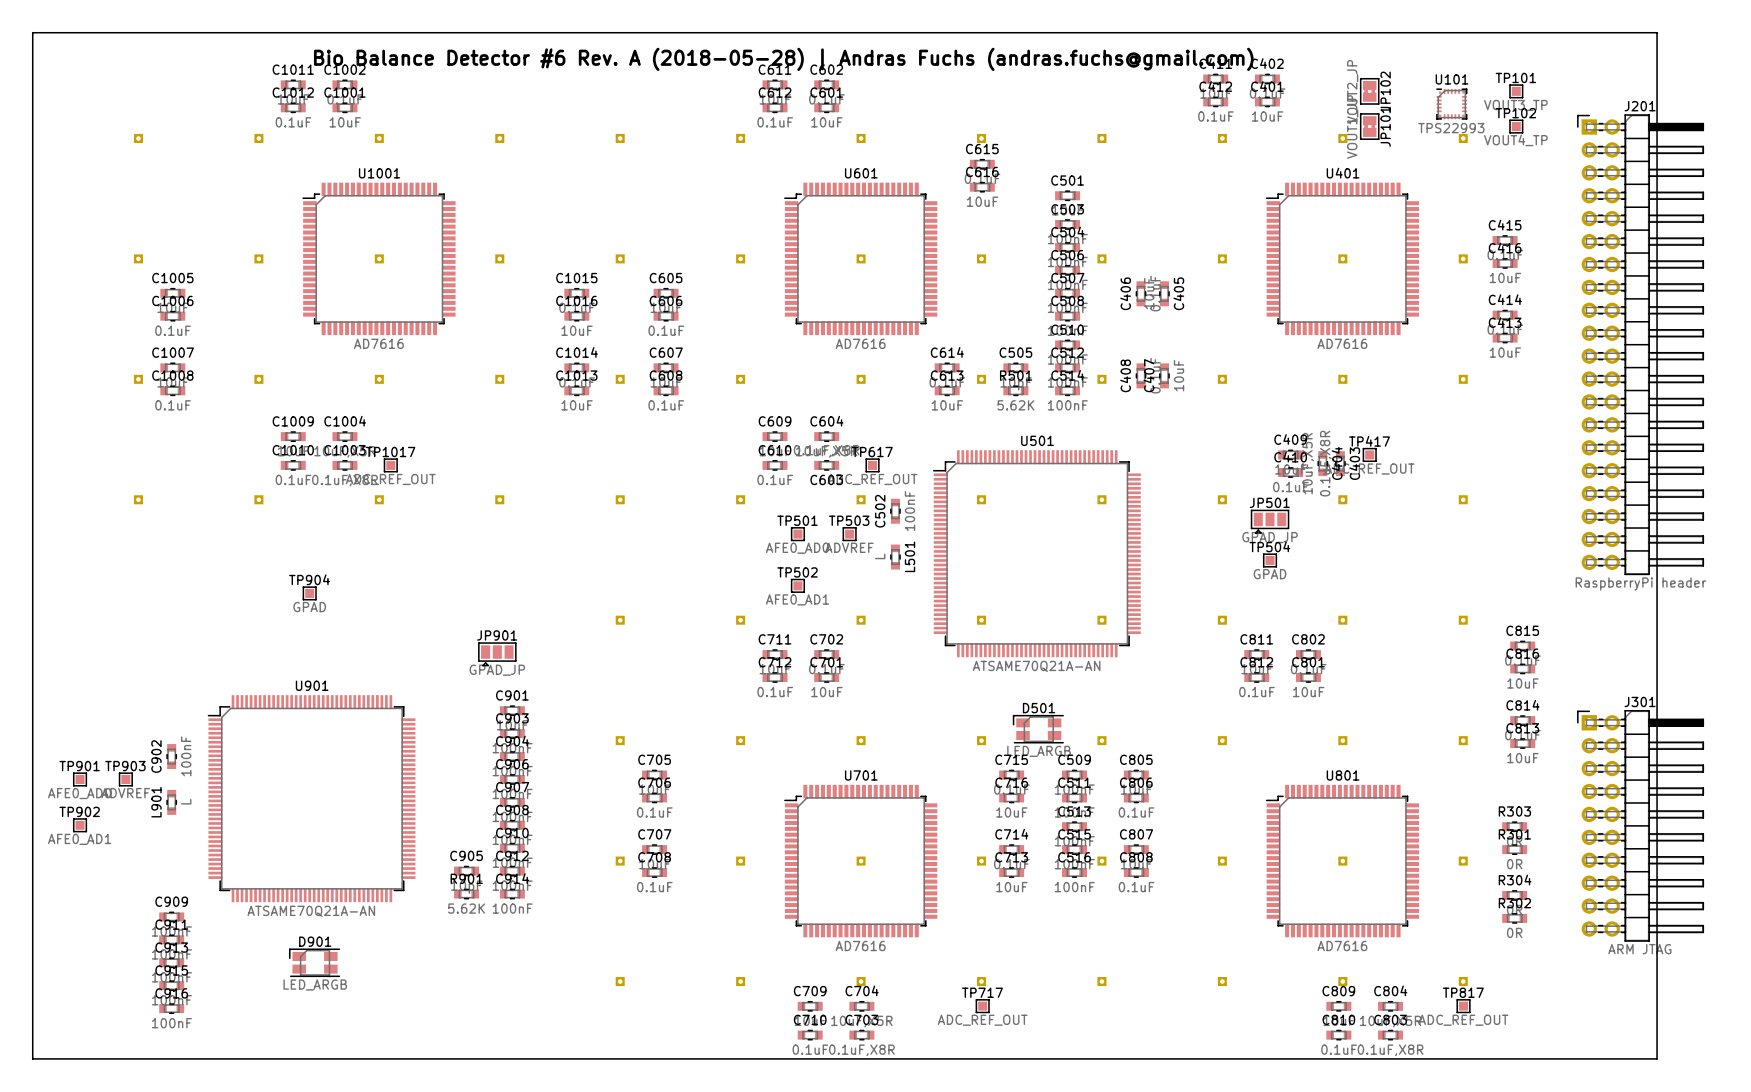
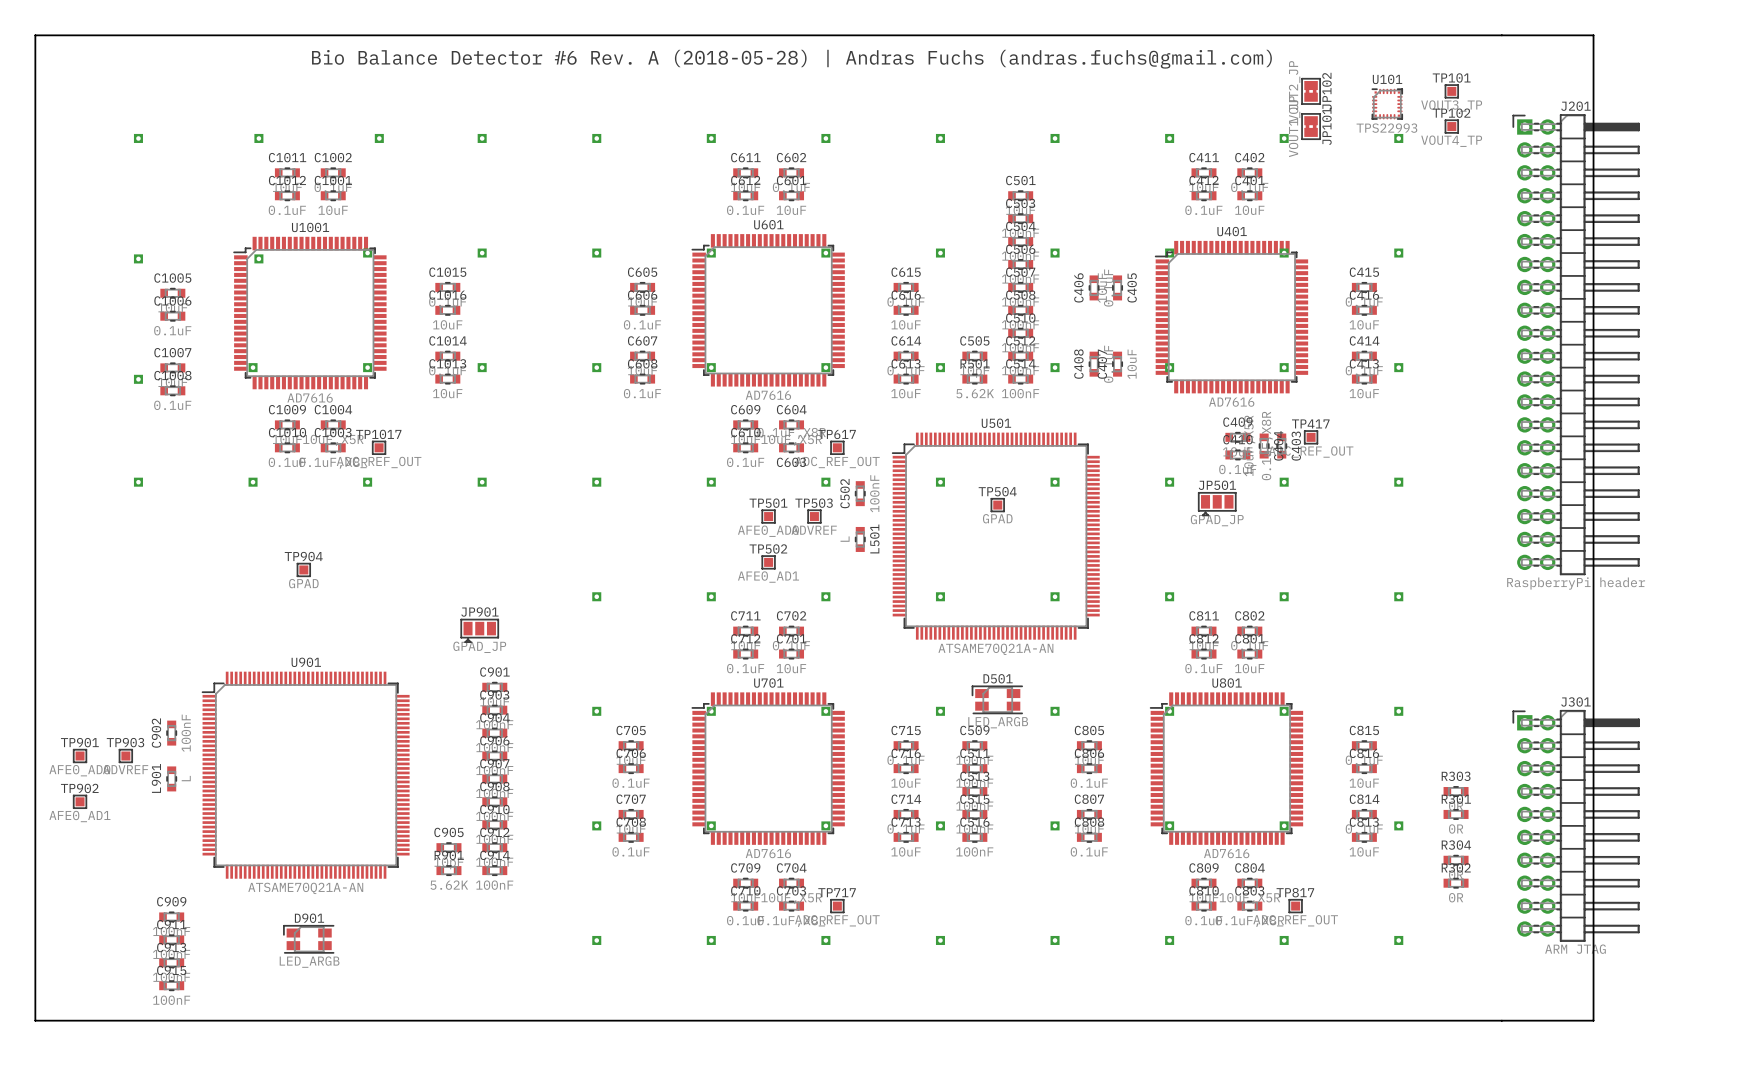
board edge: (32, 32) (32, 1058) (1657, 1058) (1657, 32) (32, 32) -> (35, 35) (35, 1020) (1593, 1020) (1593, 35) (35, 35)
C411 position: (1215, 79) -> (1203, 172)
C402 position: (1267, 79) -> (1249, 172)
C1011 position: (293, 84) -> (287, 172)
C1002 position: (344, 84) -> (333, 172)
C611 position: (775, 84) -> (745, 172)
C602 position: (826, 84) -> (791, 172)
JP102 position: (1369, 91) -> (1311, 91)
TP101 position: (1516, 91) -> (1451, 91)
C412 position: (1215, 101) -> (1203, 195)
C401 position: (1267, 101) -> (1249, 195)
U101 position: (1451, 104) -> (1387, 104)
C1012 position: (293, 107) -> (287, 195)
C1001 position: (344, 107) -> (333, 195)
C612 position: (775, 107) -> (745, 195)
C601 position: (826, 107) -> (791, 195)
JP101 position: (1369, 126) -> (1311, 126)
TP102 position: (1516, 126) -> (1451, 126)
part position: (499, 138) -> (482, 138)
part position: (620, 138) -> (596, 138)
part position: (740, 138) -> (711, 138)
part position: (861, 138) -> (825, 138)
part: none -> (940, 138)
part: (981, 138) -> none
part: none -> (1055, 138)
part: (1101, 138) -> none
part: none -> (1169, 138)
part: (1222, 138) -> none
part: none -> (1284, 138)
part: (1342, 138) -> none
part: none -> (1398, 138)
part: (1463, 138) -> none
C615 position: (982, 164) -> (906, 287)
C616 position: (982, 187) -> (906, 310)
C501 position: (1067, 195) -> (1020, 195)
C503 position: (1067, 224) -> (1020, 218)
C415 position: (1505, 240) -> (1364, 287)
C504 position: (1067, 247) -> (1020, 241)
part: none -> (940, 253)
part: none -> (1055, 253)
part: none -> (1169, 253)
part: none -> (1284, 253)
part: none -> (1398, 253)
U1001 position: (379, 258) -> (309, 313)
part position: (379, 258) -> (367, 253)
part position: (499, 258) -> (482, 253)
part position: (620, 258) -> (596, 253)
part position: (740, 258) -> (711, 253)
U601 position: (860, 258) -> (768, 310)
part position: (861, 258) -> (825, 253)
part: (981, 258) -> none
part: (1101, 258) -> none
part: (1222, 258) -> none
U401 position: (1342, 258) -> (1231, 317)
part: (1342, 258) -> none
part: (1463, 258) -> none
C416 position: (1505, 263) -> (1364, 310)
C506 position: (1067, 270) -> (1020, 264)
C1015 position: (576, 293) -> (447, 287)
C605 position: (666, 293) -> (642, 287)
C507 position: (1067, 293) -> (1020, 287)
C406 position: (1141, 293) -> (1094, 287)
C405 position: (1164, 293) -> (1117, 287)
C414 position: (1505, 315) -> (1364, 356)
C1016 position: (576, 316) -> (447, 310)
C606 position: (666, 316) -> (642, 310)
C508 position: (1067, 316) -> (1020, 310)
C413 position: (1505, 338) -> (1364, 379)
C510 position: (1067, 344) -> (1020, 333)
J201 position: (1640, 344) -> (1576, 344)
C1014 position: (576, 367) -> (447, 356)
C607 position: (666, 367) -> (642, 356)
part: none -> (940, 367)
C614 position: (947, 367) -> (906, 356)
C505 position: (1015, 367) -> (974, 356)
part: none -> (1055, 367)
C512 position: (1067, 367) -> (1020, 356)
part: none -> (1169, 367)
part: none -> (1284, 367)
part: none -> (1398, 367)
C408 position: (1141, 375) -> (1094, 364)
C407 position: (1164, 375) -> (1117, 364)
part position: (258, 379) -> (253, 367)
part position: (379, 379) -> (367, 367)
part position: (499, 379) -> (482, 367)
part position: (620, 379) -> (596, 367)
part position: (740, 379) -> (711, 367)
part position: (861, 379) -> (825, 367)
part: (981, 379) -> none
part: (1101, 379) -> none
part: (1222, 379) -> none
part: (1342, 379) -> none
part: (1463, 379) -> none
C1013 position: (576, 390) -> (447, 379)
C608 position: (666, 390) -> (642, 379)
C613 position: (947, 390) -> (906, 379)
R501 position: (1015, 390) -> (974, 379)
C514 position: (1067, 390) -> (1020, 379)
C1009 position: (293, 436) -> (287, 424)
C1004 position: (344, 436) -> (333, 424)
C609 position: (775, 436) -> (745, 424)
C604 position: (826, 436) -> (791, 424)
C409 position: (1290, 454) -> (1237, 437)
TP417 position: (1369, 454) -> (1311, 437)
C404 position: (1322, 463) -> (1264, 446)
C403 position: (1340, 463) -> (1281, 446)
C1010 position: (293, 465) -> (287, 447)
C1003 position: (344, 465) -> (333, 447)
TP1017 position: (390, 465) -> (379, 447)
C610 position: (775, 465) -> (745, 447)
C603 position: (826, 465) -> (791, 447)
TP617 position: (872, 465) -> (837, 447)
C410 position: (1290, 472) -> (1237, 454)
part: none -> (940, 482)
part: none -> (1055, 482)
part: none -> (1169, 482)
part: none -> (1284, 482)
part: none -> (1398, 482)
part position: (138, 499) -> (138, 482)
part position: (258, 499) -> (253, 482)
part position: (379, 499) -> (367, 482)
part position: (499, 499) -> (482, 482)
part position: (620, 499) -> (596, 482)
part position: (740, 499) -> (711, 482)
part position: (861, 499) -> (825, 482)
part: (981, 499) -> none
part: (1101, 499) -> none
part: (1222, 499) -> none
part: (1342, 499) -> none
part: (1463, 499) -> none
C502 position: (895, 511) -> (860, 493)
JP501 position: (1270, 521) -> (1217, 504)
TP501 position: (797, 534) -> (768, 516)
TP503 position: (849, 534) -> (814, 516)
U501 position: (1036, 553) -> (995, 536)
L501 position: (895, 557) -> (860, 539)
TP504 position: (1270, 560) -> (997, 505)
TP502 position: (797, 585) -> (768, 562)
TP904 position: (309, 593) -> (303, 569)
part: none -> (825, 596)
part: none -> (940, 596)
part: none -> (1055, 596)
part: none -> (1169, 596)
part: none -> (1284, 596)
part: none -> (1398, 596)
part position: (620, 620) -> (596, 596)
part position: (740, 620) -> (711, 596)
part: (861, 620) -> none
part: (981, 620) -> none
part: (1101, 620) -> none
part: (1222, 620) -> none
part: (1342, 620) -> none
part: (1463, 620) -> none
C815 position: (1522, 646) -> (1364, 745)
JP901 position: (497, 654) -> (479, 630)
C711 position: (775, 654) -> (745, 631)
C702 position: (826, 654) -> (791, 631)
C811 position: (1256, 654) -> (1203, 631)
C802 position: (1308, 654) -> (1249, 631)
C816 position: (1522, 668) -> (1364, 768)
C712 position: (775, 677) -> (745, 654)
C701 position: (826, 677) -> (791, 654)
C812 position: (1256, 677) -> (1203, 654)
C801 position: (1308, 677) -> (1249, 654)
C901 position: (512, 710) -> (494, 687)
part: none -> (825, 711)
part: none -> (940, 711)
part: none -> (1055, 711)
part: none -> (1169, 711)
part: none -> (1284, 711)
part: none -> (1398, 711)
C814 position: (1522, 720) -> (1364, 814)
D501 position: (1038, 729) -> (997, 699)
C903 position: (512, 733) -> (494, 710)
part position: (620, 740) -> (596, 711)
part position: (740, 740) -> (711, 711)
part: (861, 740) -> none
part: (981, 740) -> none
part: (1101, 740) -> none
part: (1222, 740) -> none
part: (1342, 740) -> none
part: (1463, 740) -> none
C813 position: (1522, 743) -> (1364, 837)
C902 position: (171, 756) -> (171, 733)
C904 position: (512, 756) -> (494, 733)
C705 position: (654, 775) -> (631, 745)
C715 position: (1011, 775) -> (906, 745)
C509 position: (1074, 775) -> (974, 745)
C805 position: (1136, 775) -> (1089, 745)
TP901 position: (80, 779) -> (80, 756)
TP903 position: (125, 779) -> (125, 756)
C906 position: (512, 779) -> (494, 756)
C706 position: (654, 797) -> (631, 768)
C716 position: (1011, 797) -> (906, 768)
C511 position: (1074, 797) -> (974, 768)
C806 position: (1136, 797) -> (1089, 768)
U901 position: (311, 798) -> (305, 775)
L901 position: (171, 802) -> (171, 778)
C907 position: (512, 802) -> (494, 778)
TP902 position: (80, 825) -> (80, 801)
C908 position: (512, 825) -> (494, 801)
part: none -> (596, 825)
part: none -> (711, 825)
part: none -> (825, 825)
part: none -> (940, 825)
part: none -> (1055, 825)
part: none -> (1169, 825)
part: none -> (1284, 825)
part: none -> (1398, 825)
J301 position: (1640, 825) -> (1576, 825)
C513 position: (1074, 826) -> (974, 791)
R303 position: (1514, 826) -> (1456, 791)
C910 position: (512, 848) -> (494, 824)
C707 position: (654, 849) -> (631, 814)
C714 position: (1011, 849) -> (906, 814)
C515 position: (1074, 849) -> (974, 814)
C807 position: (1136, 849) -> (1089, 814)
R301 position: (1514, 849) -> (1456, 814)
part: (620, 861) -> none
part: (740, 861) -> none
U701 position: (860, 861) -> (768, 768)
part: (861, 861) -> none
part: (981, 861) -> none
part: (1101, 861) -> none
part: (1222, 861) -> none
U801 position: (1342, 861) -> (1226, 768)
part: (1342, 861) -> none
part: (1463, 861) -> none
C905 position: (466, 871) -> (448, 847)
C912 position: (512, 871) -> (494, 847)
C708 position: (654, 872) -> (631, 837)
C713 position: (1011, 872) -> (906, 837)
C516 position: (1074, 872) -> (974, 837)
C808 position: (1136, 872) -> (1089, 837)
R901 position: (466, 894) -> (448, 870)
C914 position: (512, 894) -> (494, 870)
R304 position: (1514, 895) -> (1456, 860)
R302 position: (1514, 918) -> (1456, 883)
part: none -> (596, 940)
part: none -> (711, 940)
part: none -> (825, 940)
part: none -> (940, 940)
part: none -> (1055, 940)
part: none -> (1169, 940)
part: none -> (1284, 940)
part: none -> (1398, 940)
D901 position: (314, 962) -> (308, 939)
part: (620, 981) -> none
part: (740, 981) -> none
part: (861, 981) -> none
part: (981, 981) -> none
part: (1101, 981) -> none
part: (1222, 981) -> none
part: (1342, 981) -> none
part: (1463, 981) -> none
C709 position: (810, 1006) -> (745, 883)
C704 position: (861, 1006) -> (791, 883)
TP717 position: (982, 1006) -> (837, 906)
C809 position: (1338, 1006) -> (1203, 883)
C804 position: (1390, 1006) -> (1249, 883)
TP817 position: (1463, 1006) -> (1295, 906)
C916: 100nF (171, 1008) -> none
C710 position: (810, 1035) -> (745, 906)
C703 position: (861, 1035) -> (791, 906)
C810 position: (1338, 1035) -> (1203, 906)
C803 position: (1390, 1035) -> (1249, 906)

